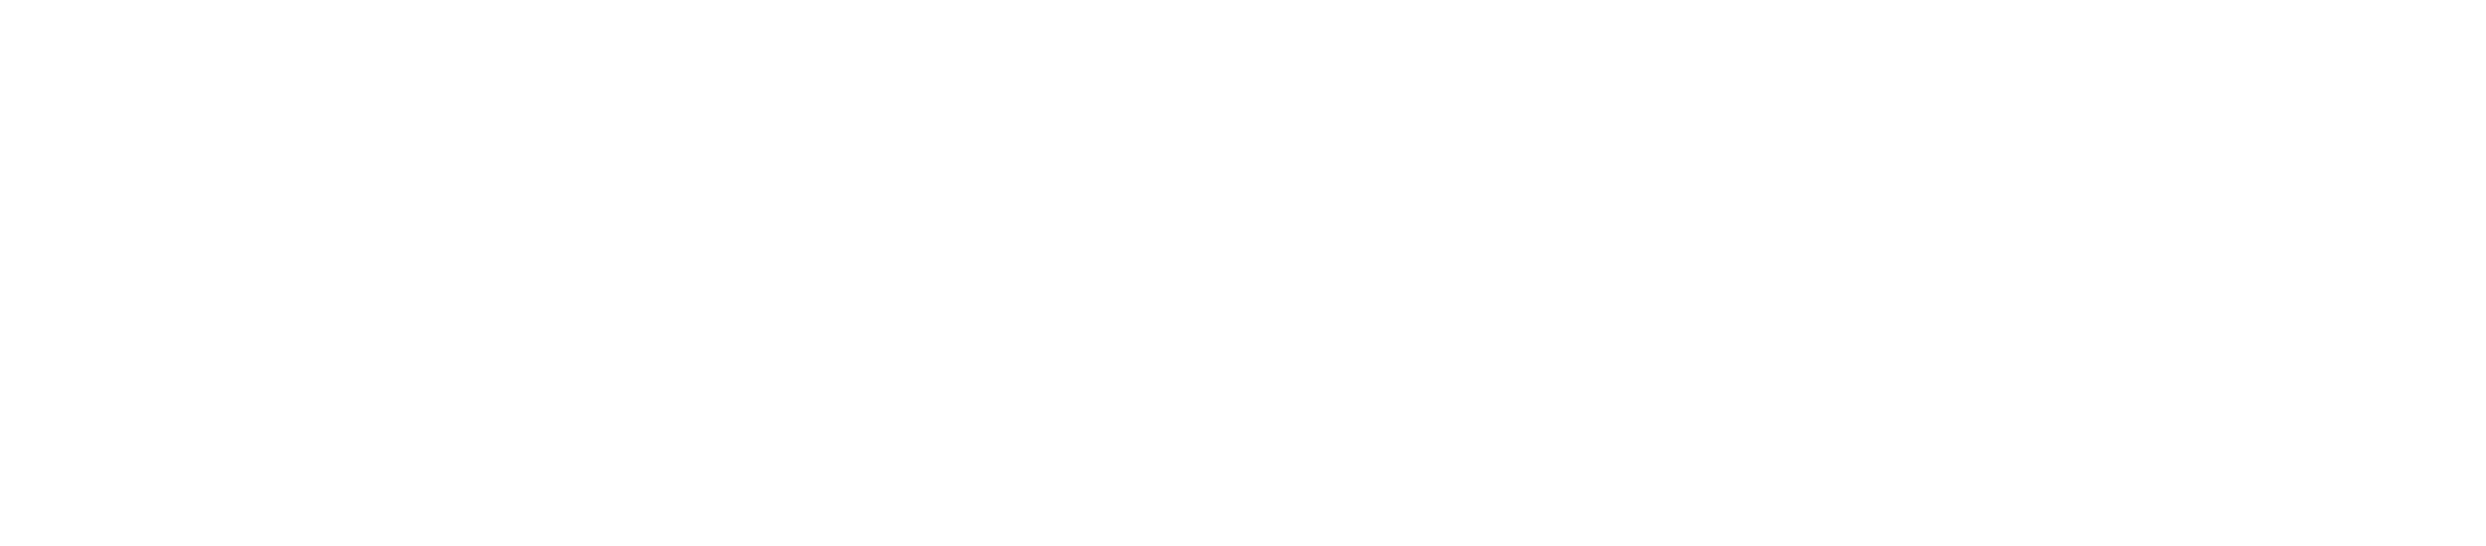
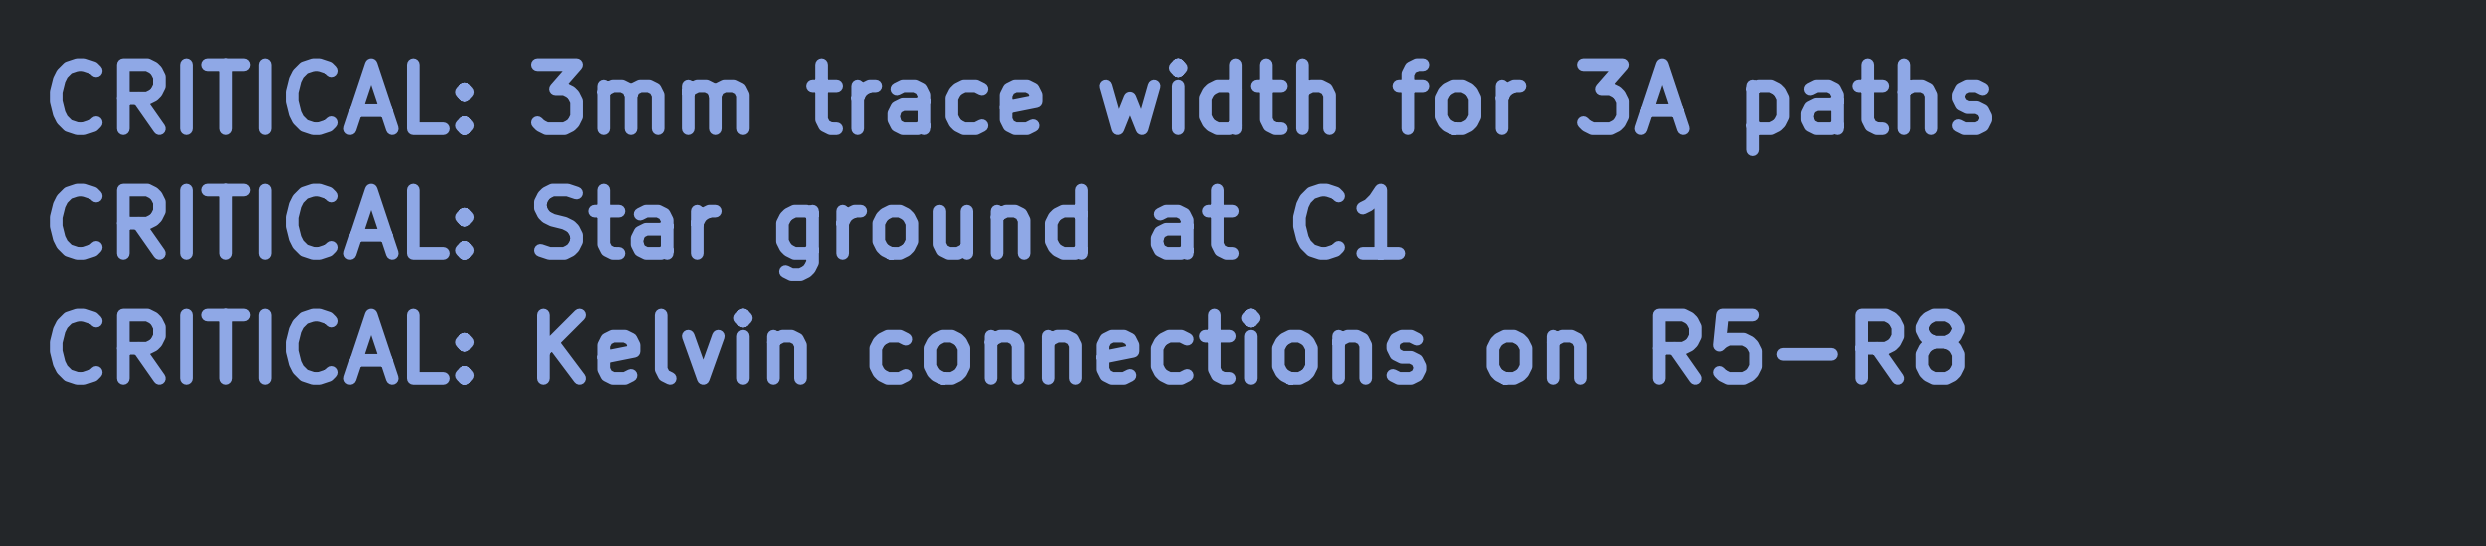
text: none -> CRITICAL: 3mm trace width for 3A paths (1021, 107)
text: none -> CRITICAL: Star ground at C1 (727, 232)
text: none -> CRITICAL: Kelvin connections on R5-R8 (1007, 346)

